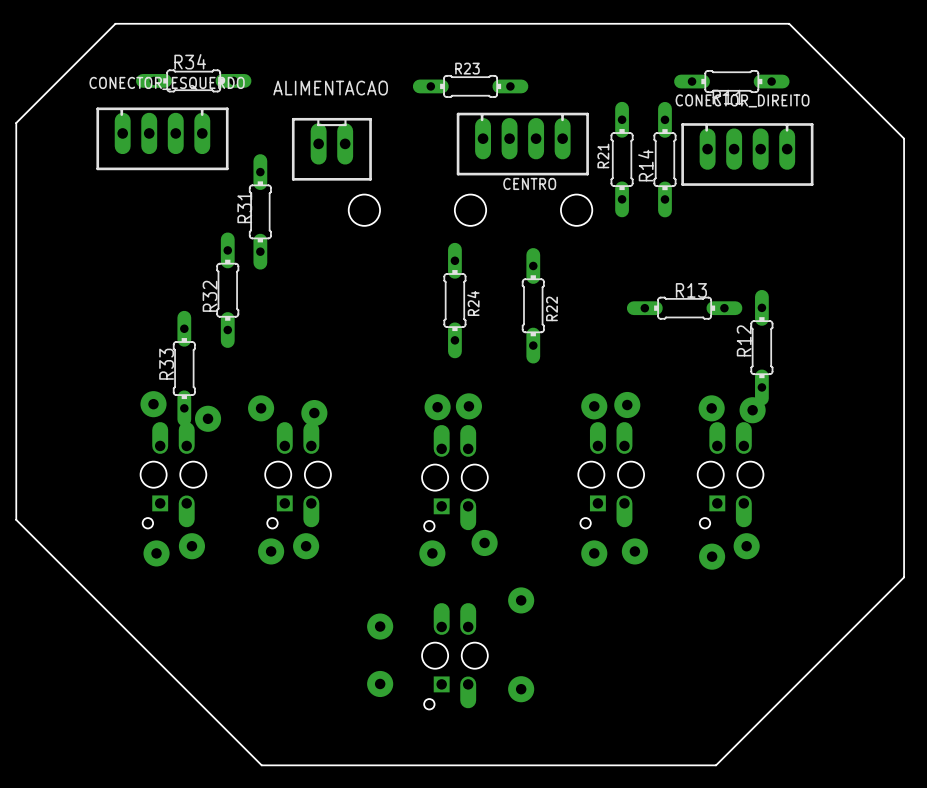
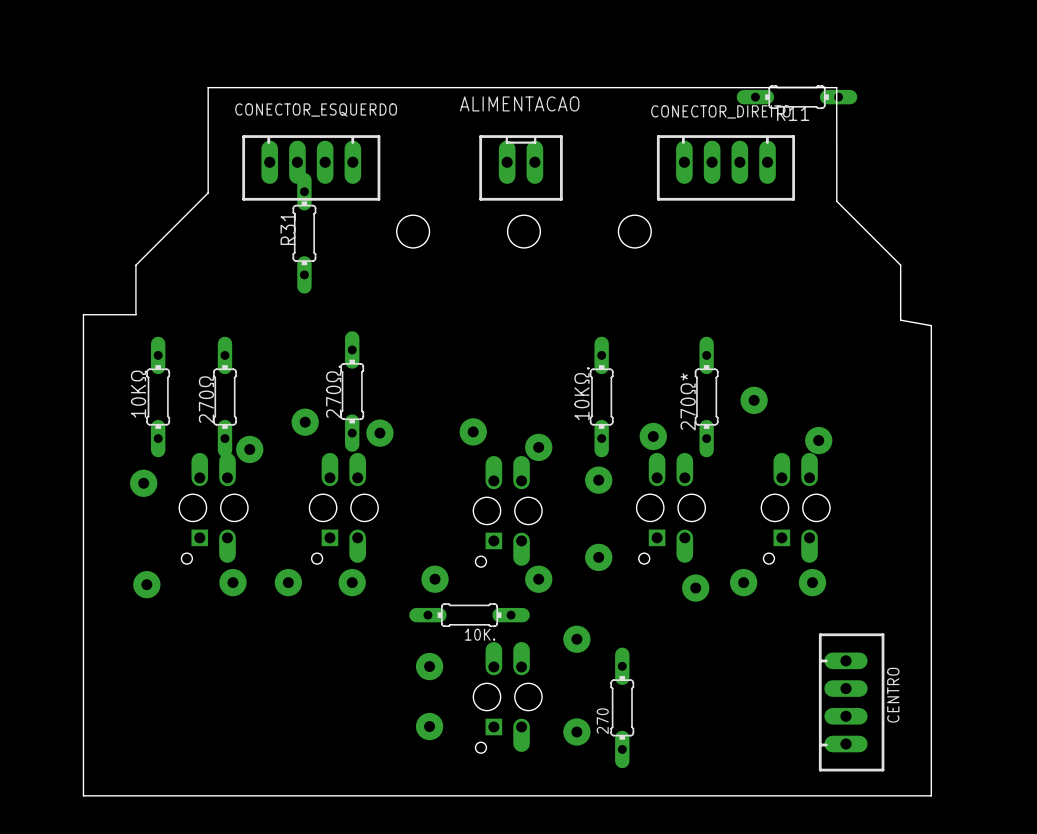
board edge: (115, 23) (789, 23) (904, 138) (904, 577) (716, 765) (261, 765) (16, 519) (16, 123) (115, 23) -> (208, 87) (208, 192) (135, 265) (135, 314) (83, 314) (83, 795) (931, 795) (931, 325) (900, 320) (900, 265) (836, 201) (836, 87) (208, 87)
R34: (193, 80) -> none
R23: (470, 86) -> none
CONECTOR_ESQUERDO position: (162, 138) -> (311, 167)
CENTRO: (522, 144) -> none
ALIMENTACAO position: (331, 149) -> (521, 167)
CONECTOR_DIREITO position: (747, 154) -> (725, 167)
R21: (622, 159) -> none
R14: (664, 159) -> none
R32: (227, 290) -> none
R24: (454, 300) -> none
R22: (533, 305) -> none
R13: (684, 308) -> none
R12: (761, 347) -> none
270Ω.: none -> (352, 391)
R33 name: R33 (166, 364) -> 270Ω (206, 399)
10KΩ: none -> (158, 396)
10KΩ.: none -> (601, 396)
270Ω*: none -> (706, 396)
via: none -> (754, 400)
via: (153, 404) -> none
via: (627, 405) -> none
via position: (468, 406) -> (538, 447)
via position: (437, 407) -> (473, 431)
via position: (261, 408) -> (305, 422)
via: (711, 408) -> none
via position: (314, 413) -> (379, 433)
via: none -> (598, 480)
via: none -> (143, 483)
via: none -> (598, 557)
via: none -> (146, 584)
via position: (271, 551) -> (288, 582)
via: (156, 553) -> none
via position: (432, 553) -> (435, 579)
via: (594, 553) -> none
via position: (712, 556) -> (743, 582)
10K.: none -> (469, 615)
CENTRO: none -> (851, 702)
270: none -> (622, 707)

